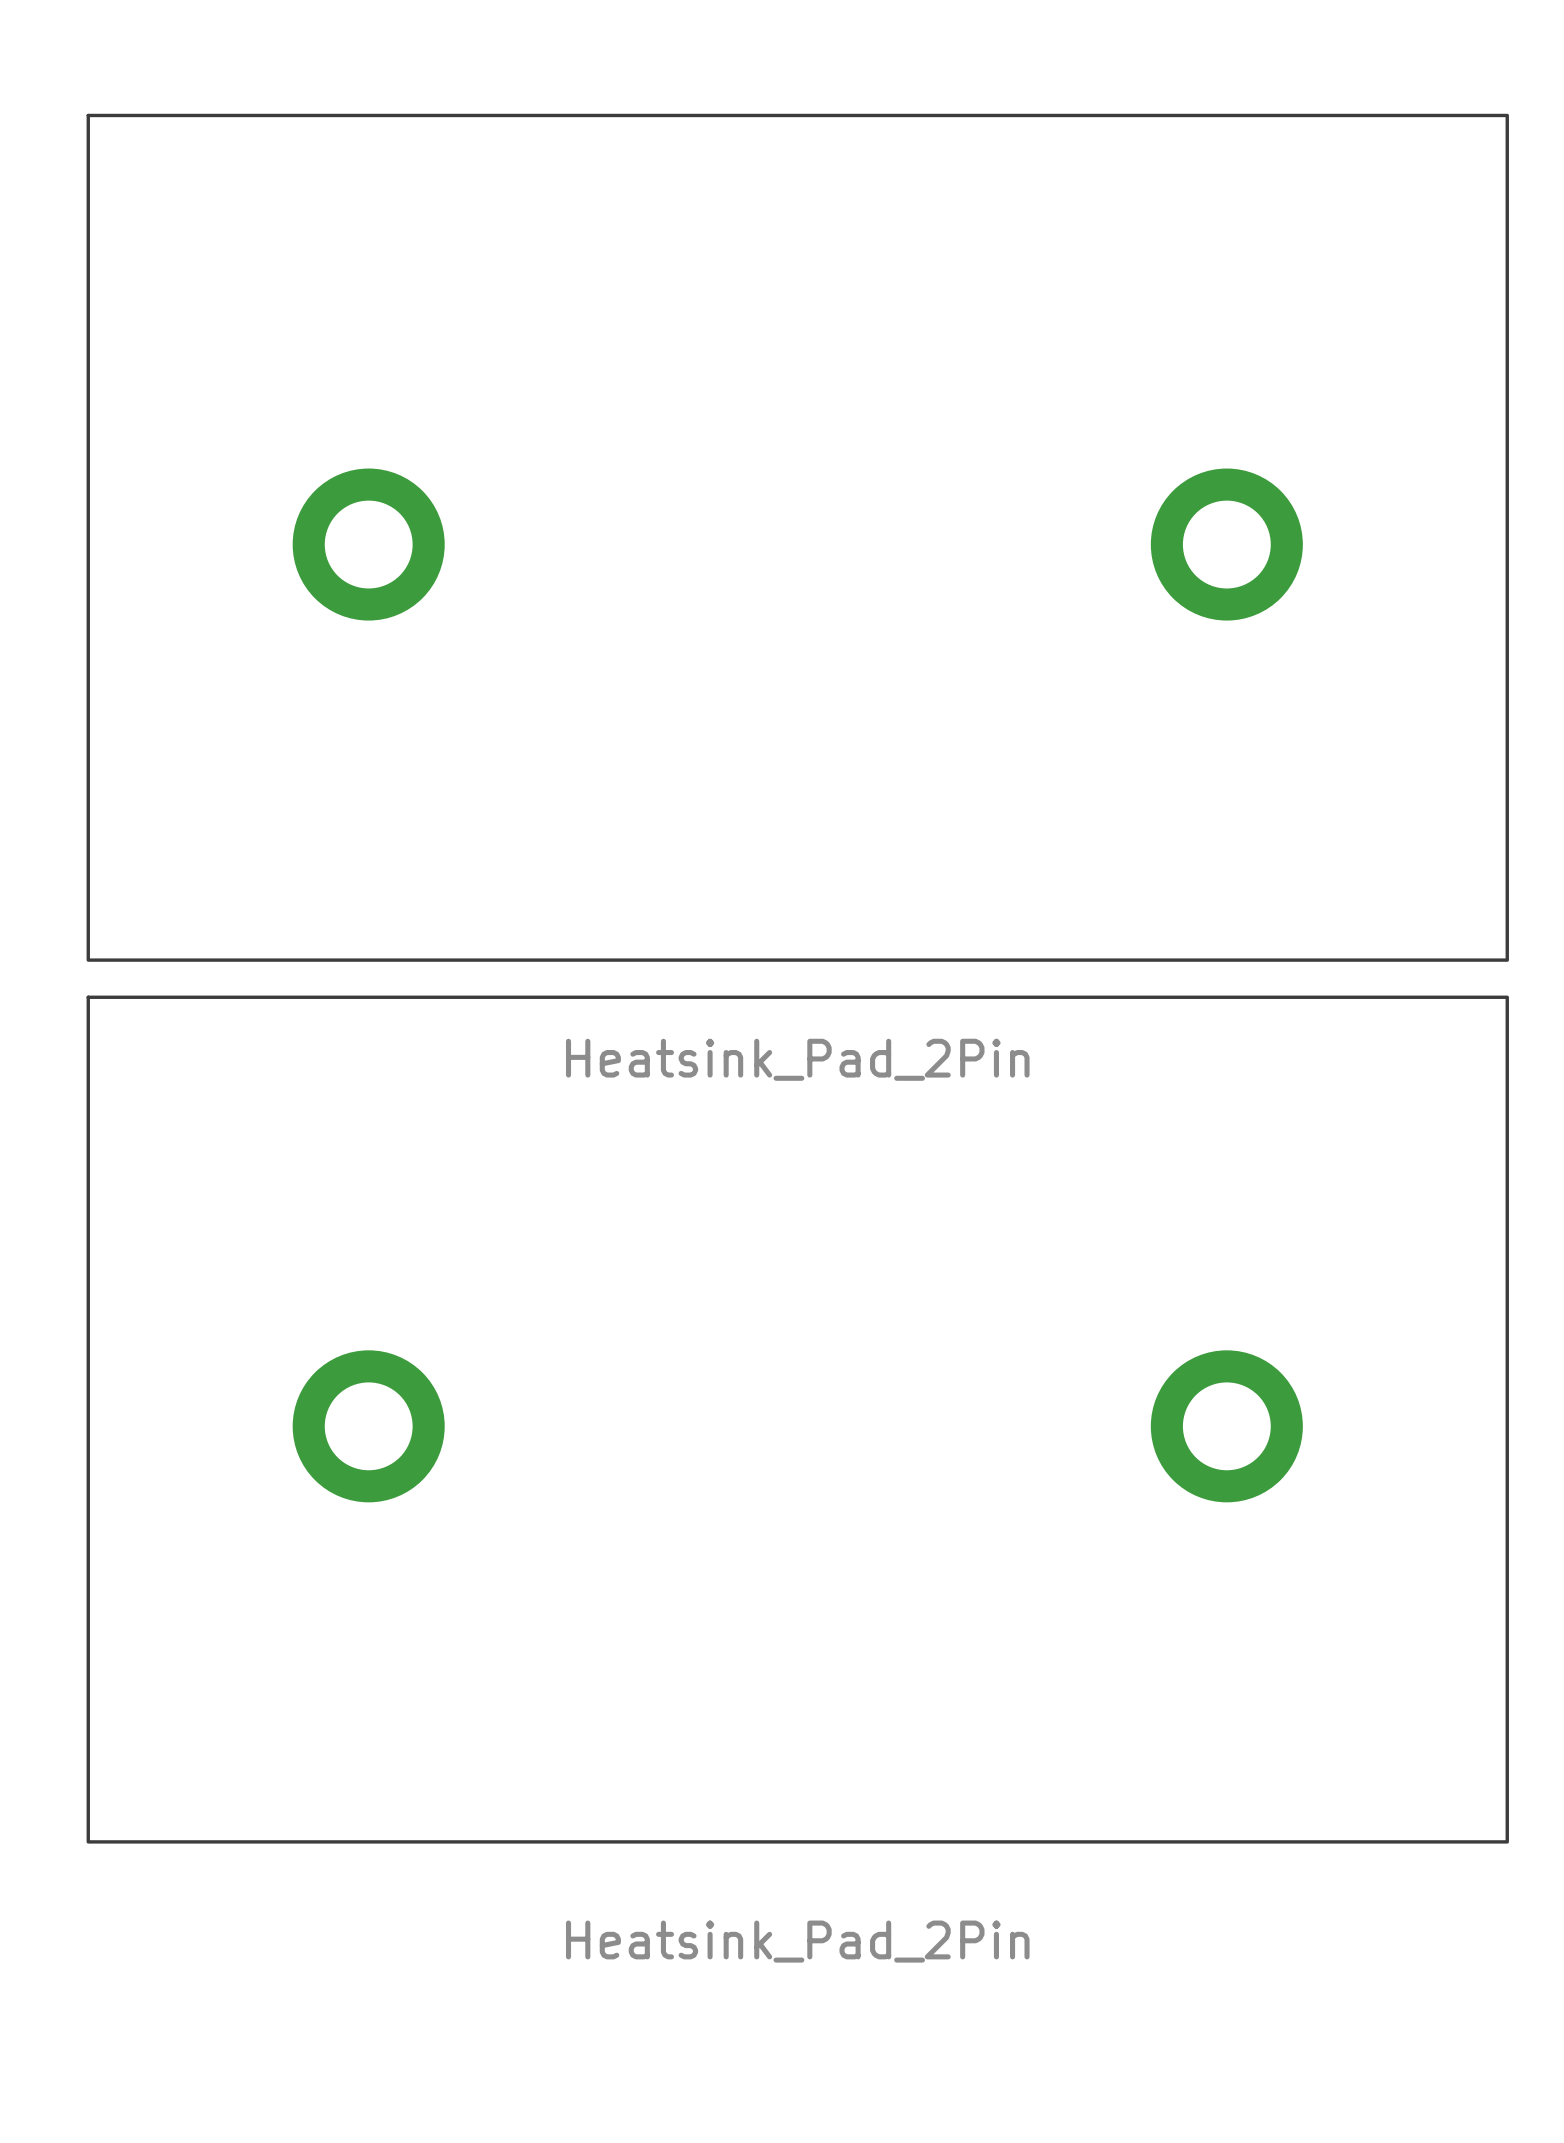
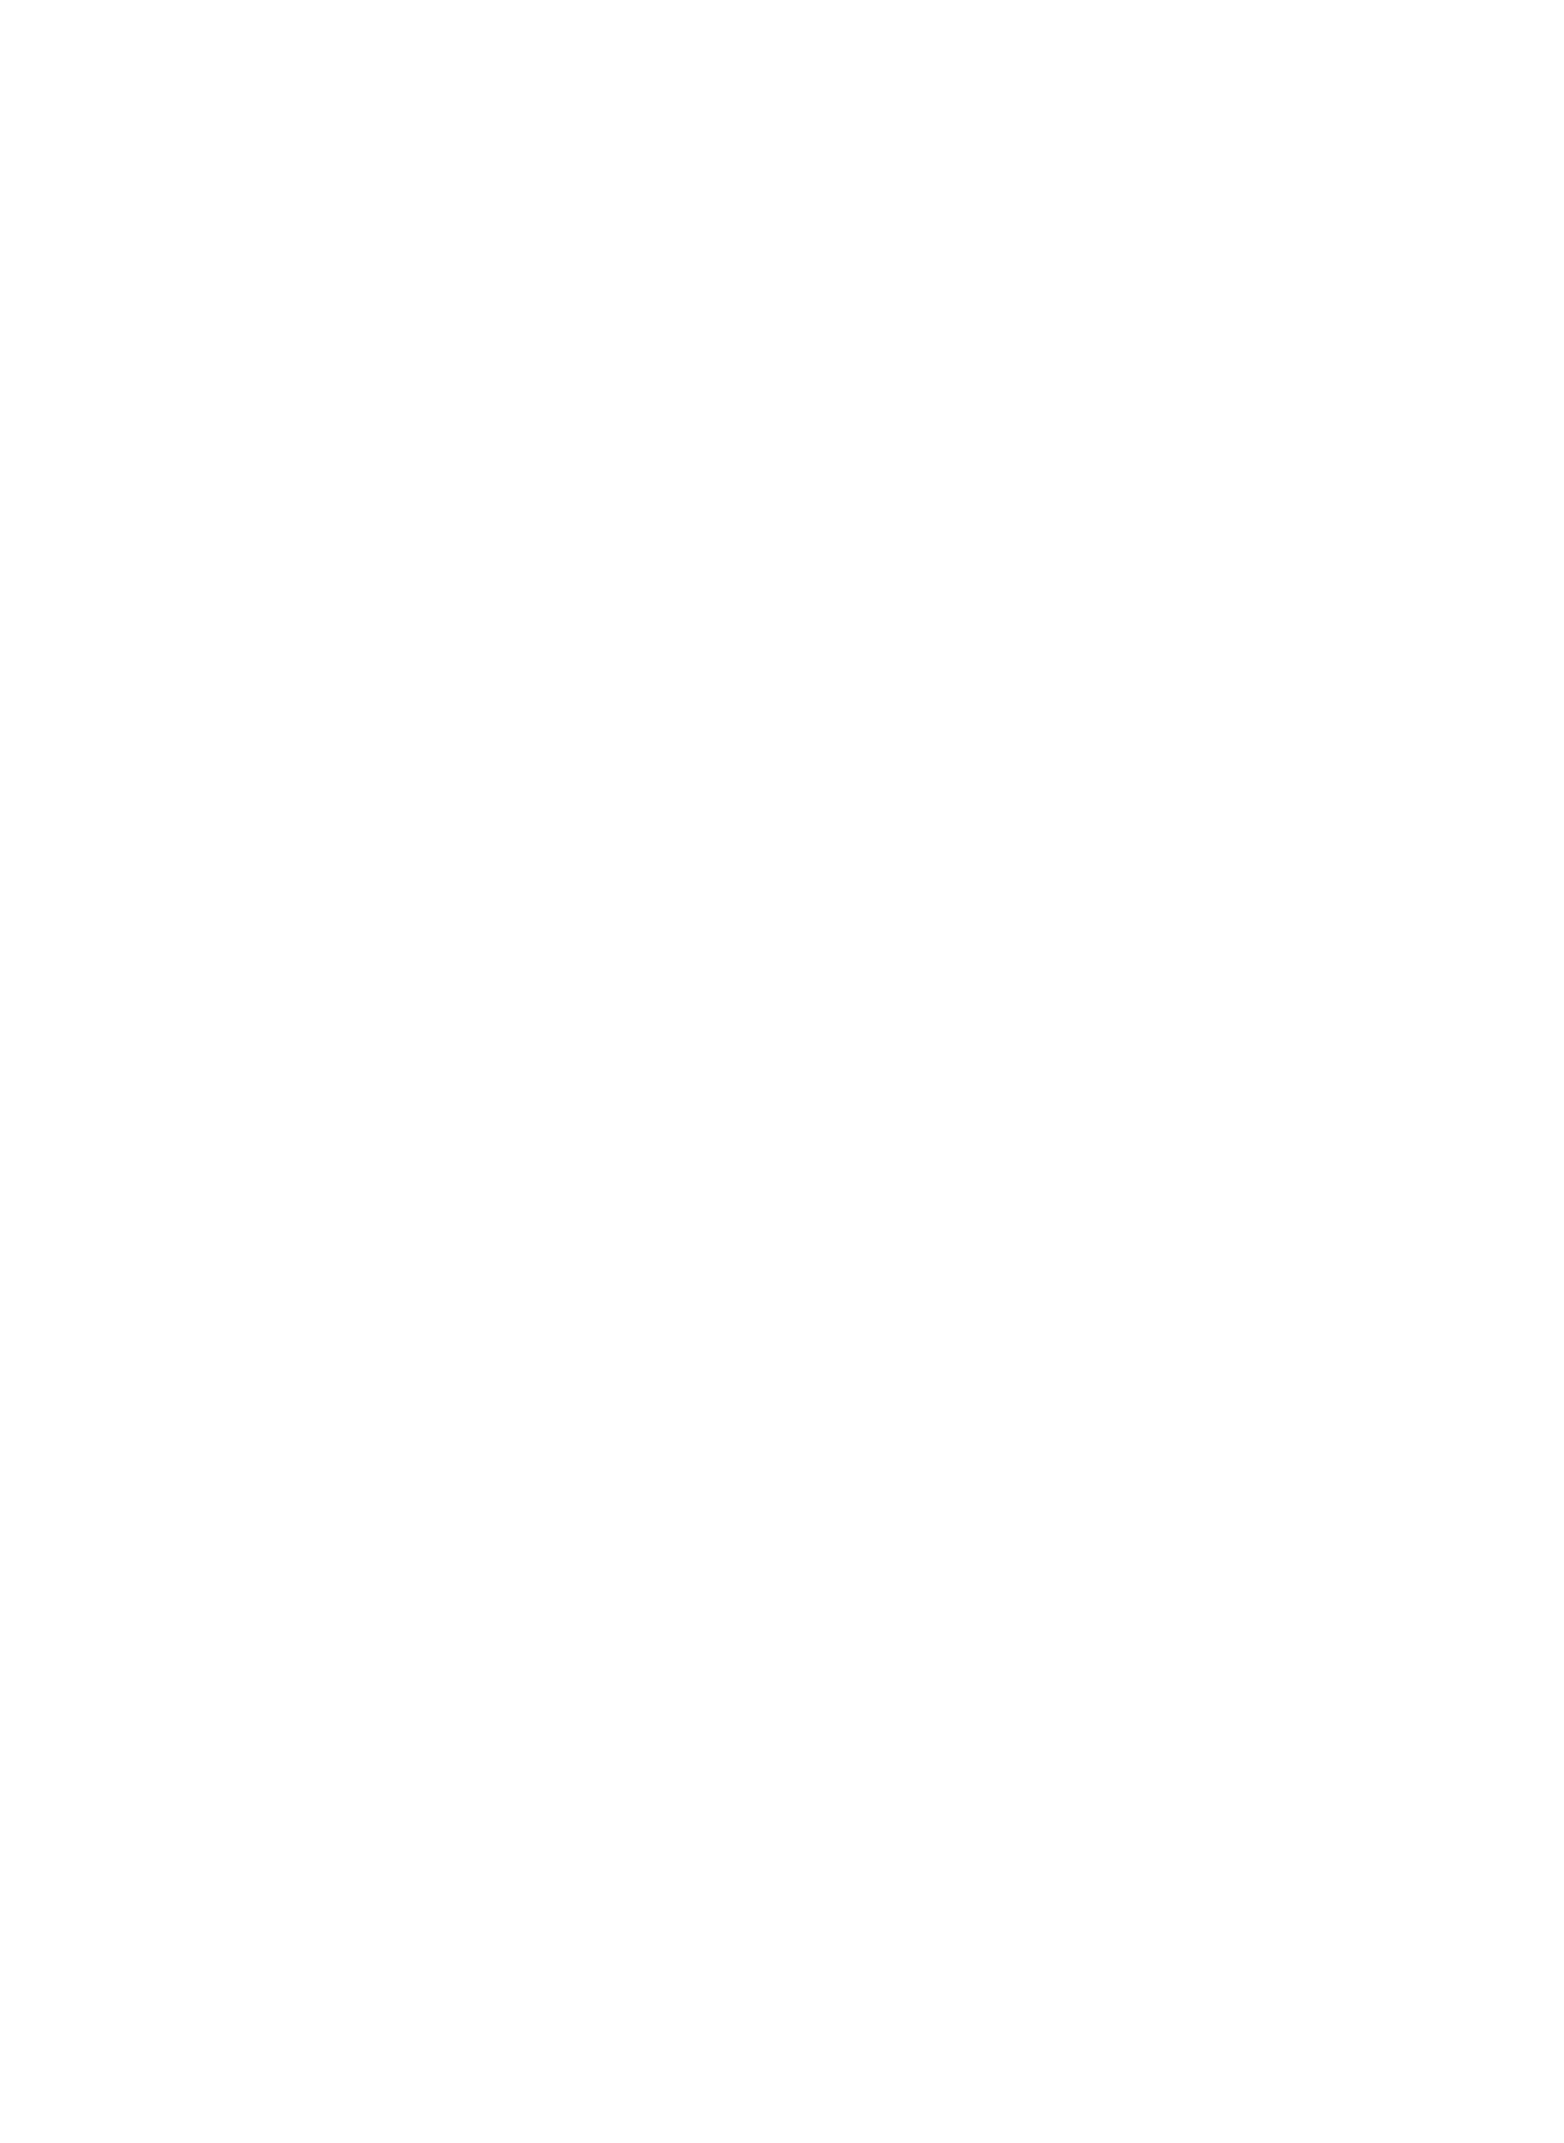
part: Heatsink_Pad_2Pin (797, 537) -> none
part: Heatsink_Pad_2Pin (797, 1419) -> none

